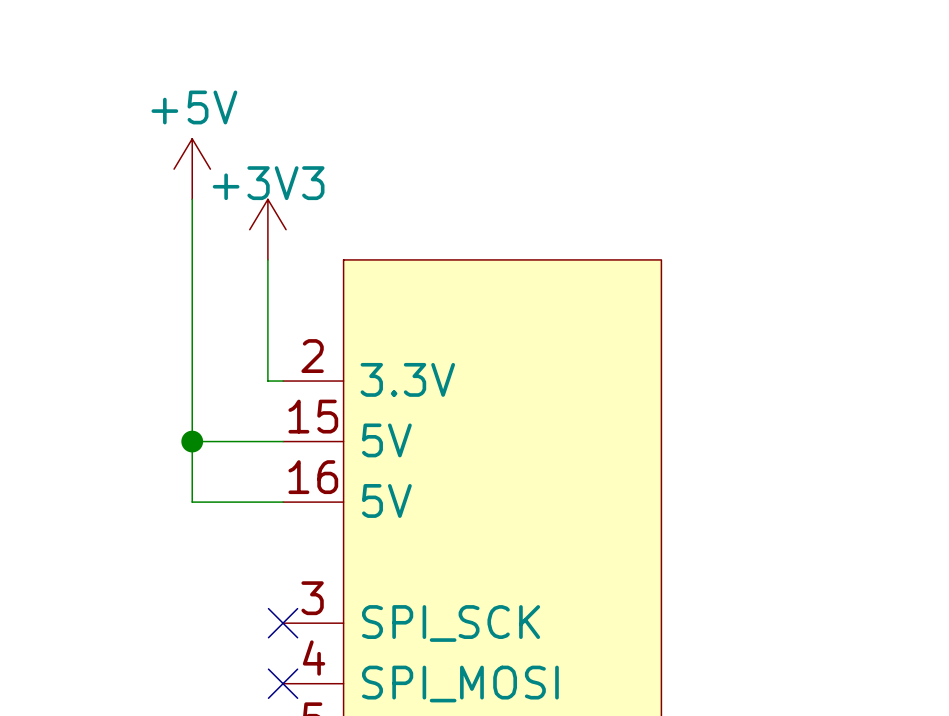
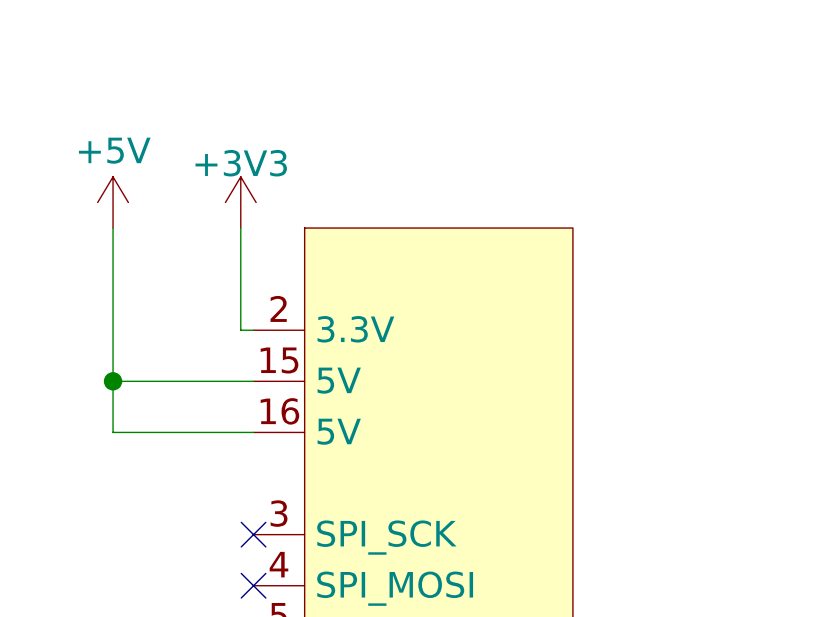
power symbol position: +5V (192, 169) -> +5V (113, 202)
wire: (192, 199) (192, 502) -> (113, 228) (113, 432) (176, 432)
wire: none -> (113, 381) (176, 381)
junction position: (192, 441) -> (113, 381)

